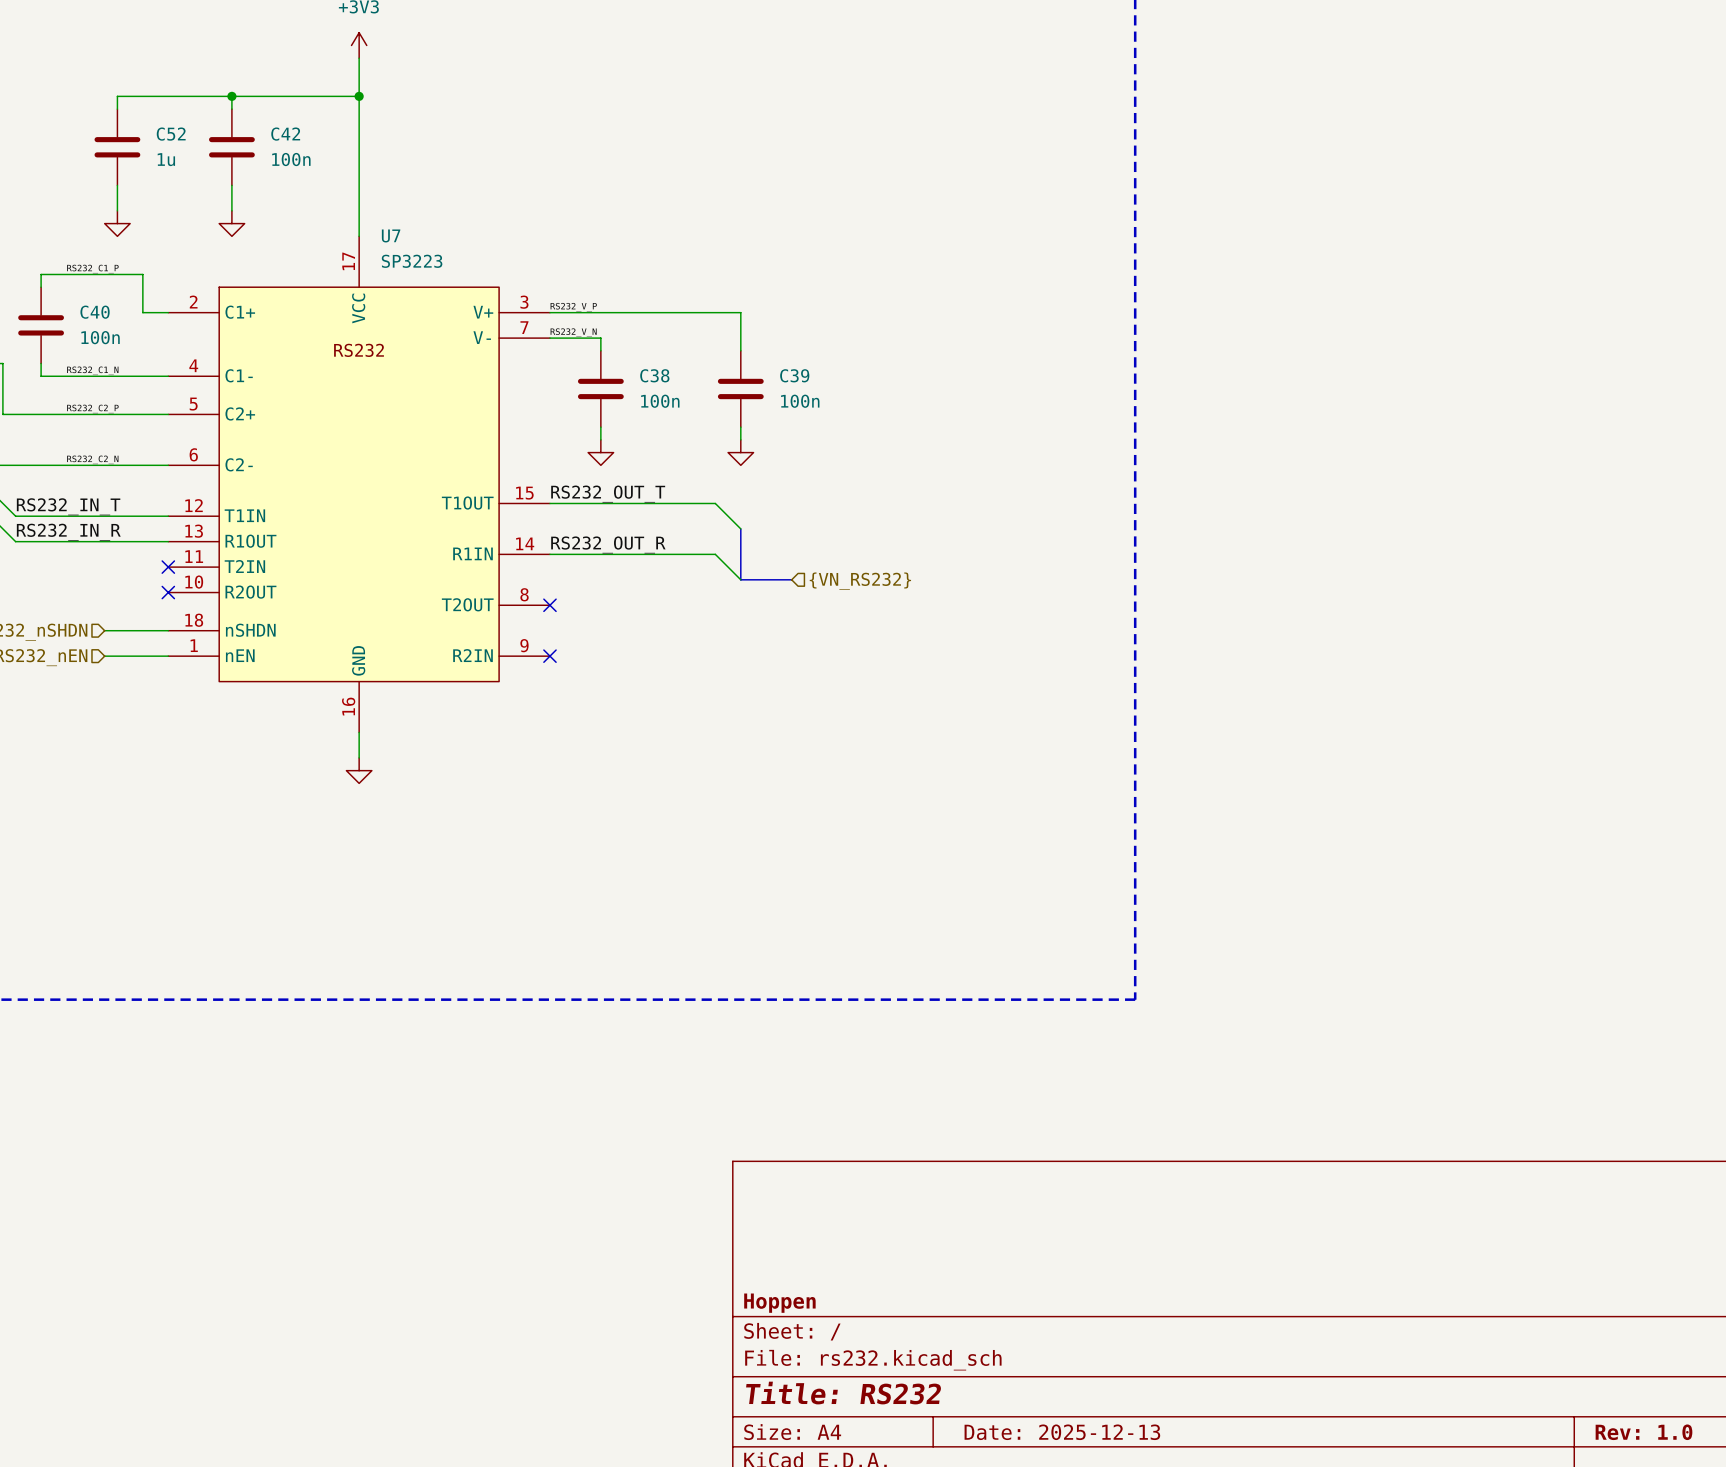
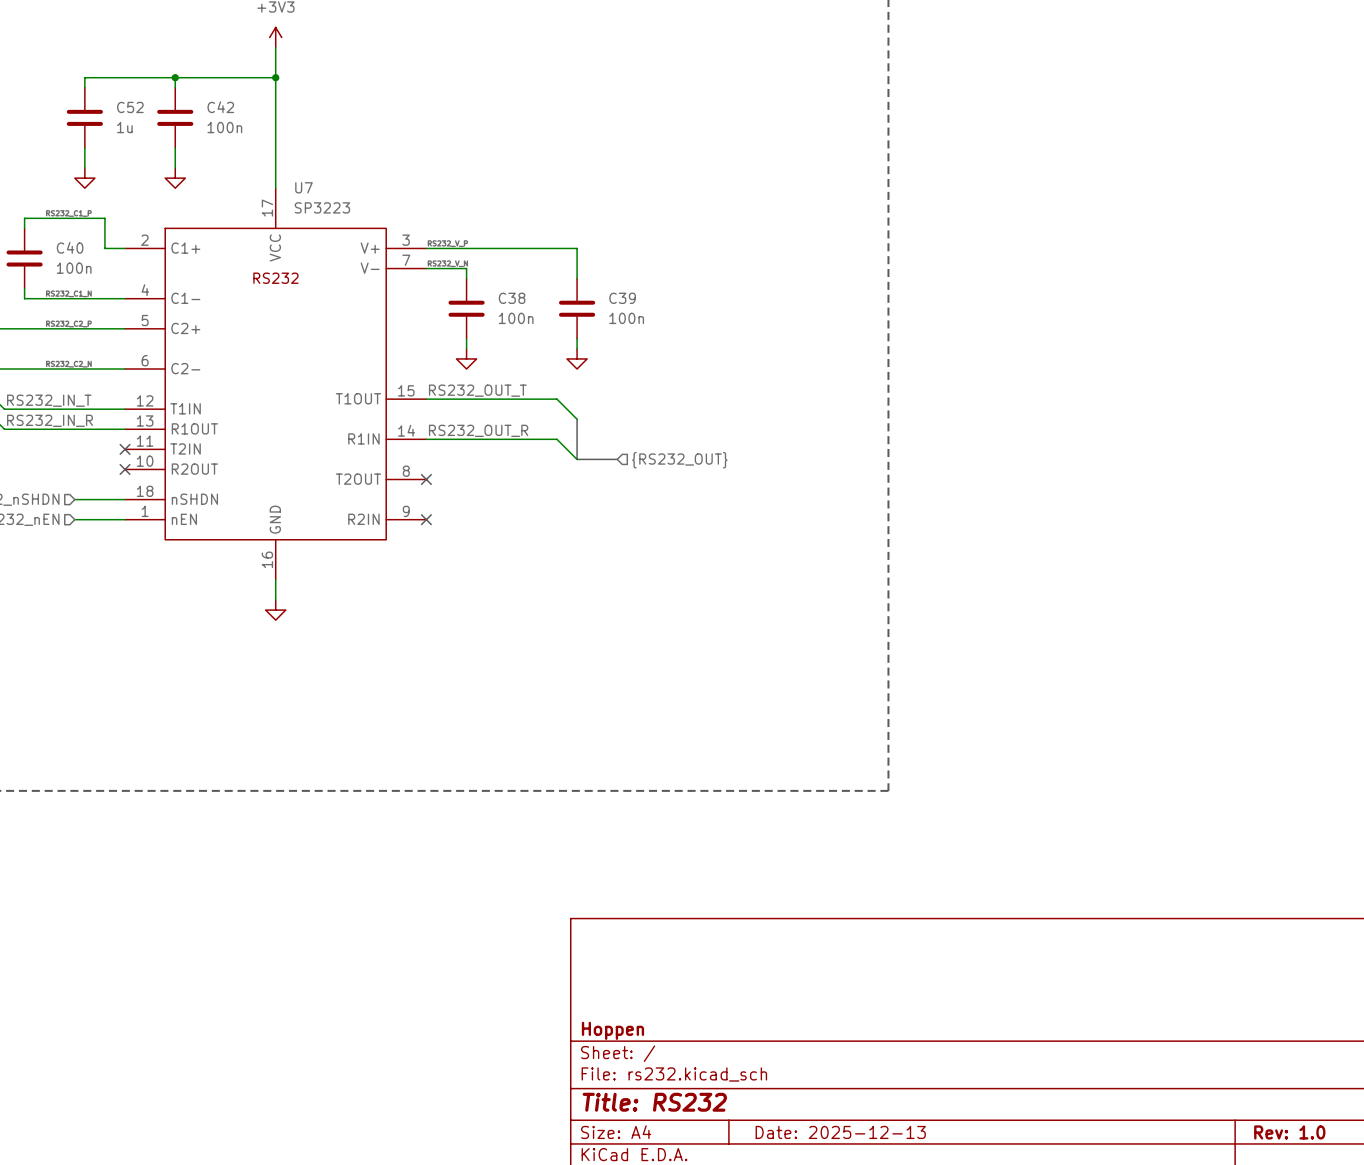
hierarchical label: {VN_RS232} (860, 581) -> {RS232_OUT} (679, 460)

